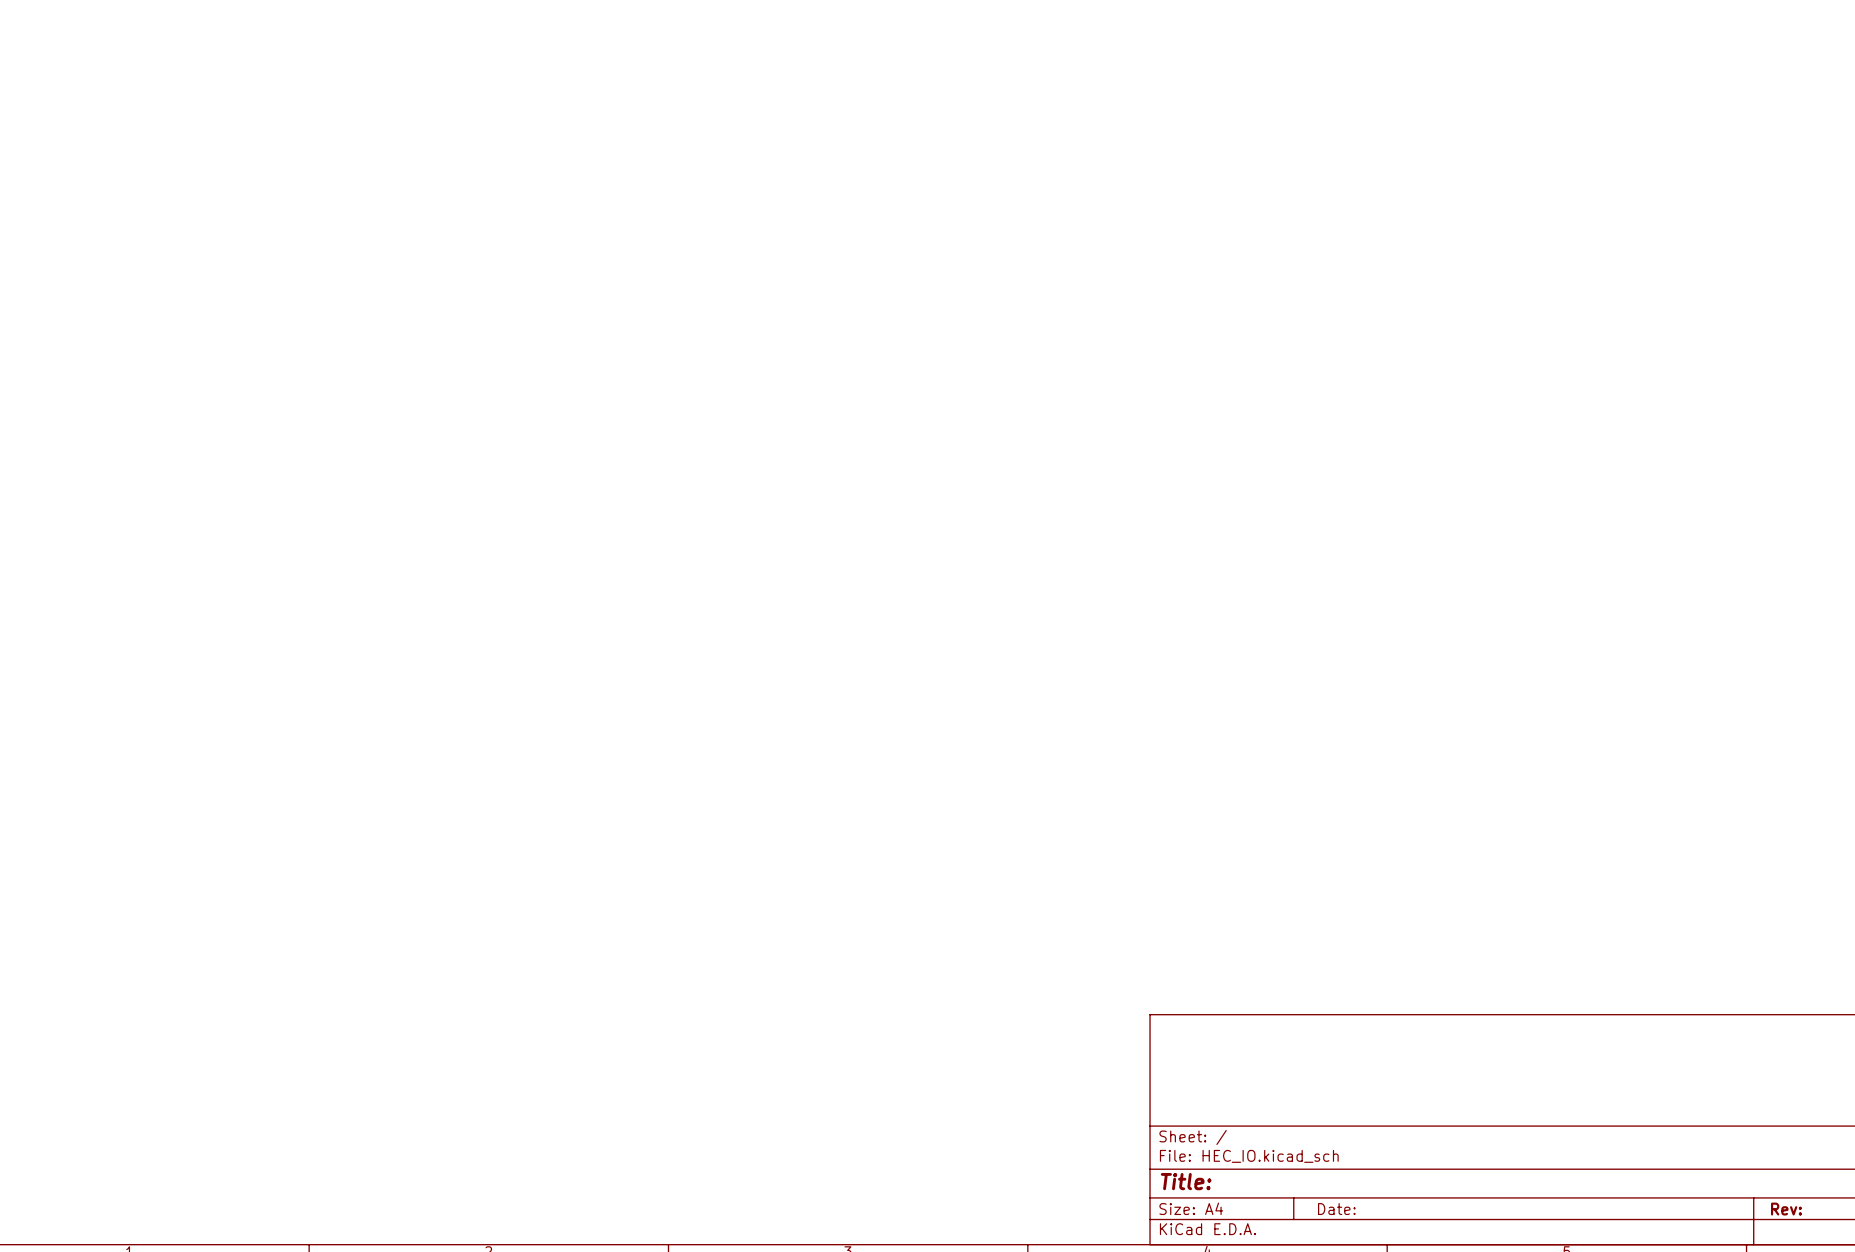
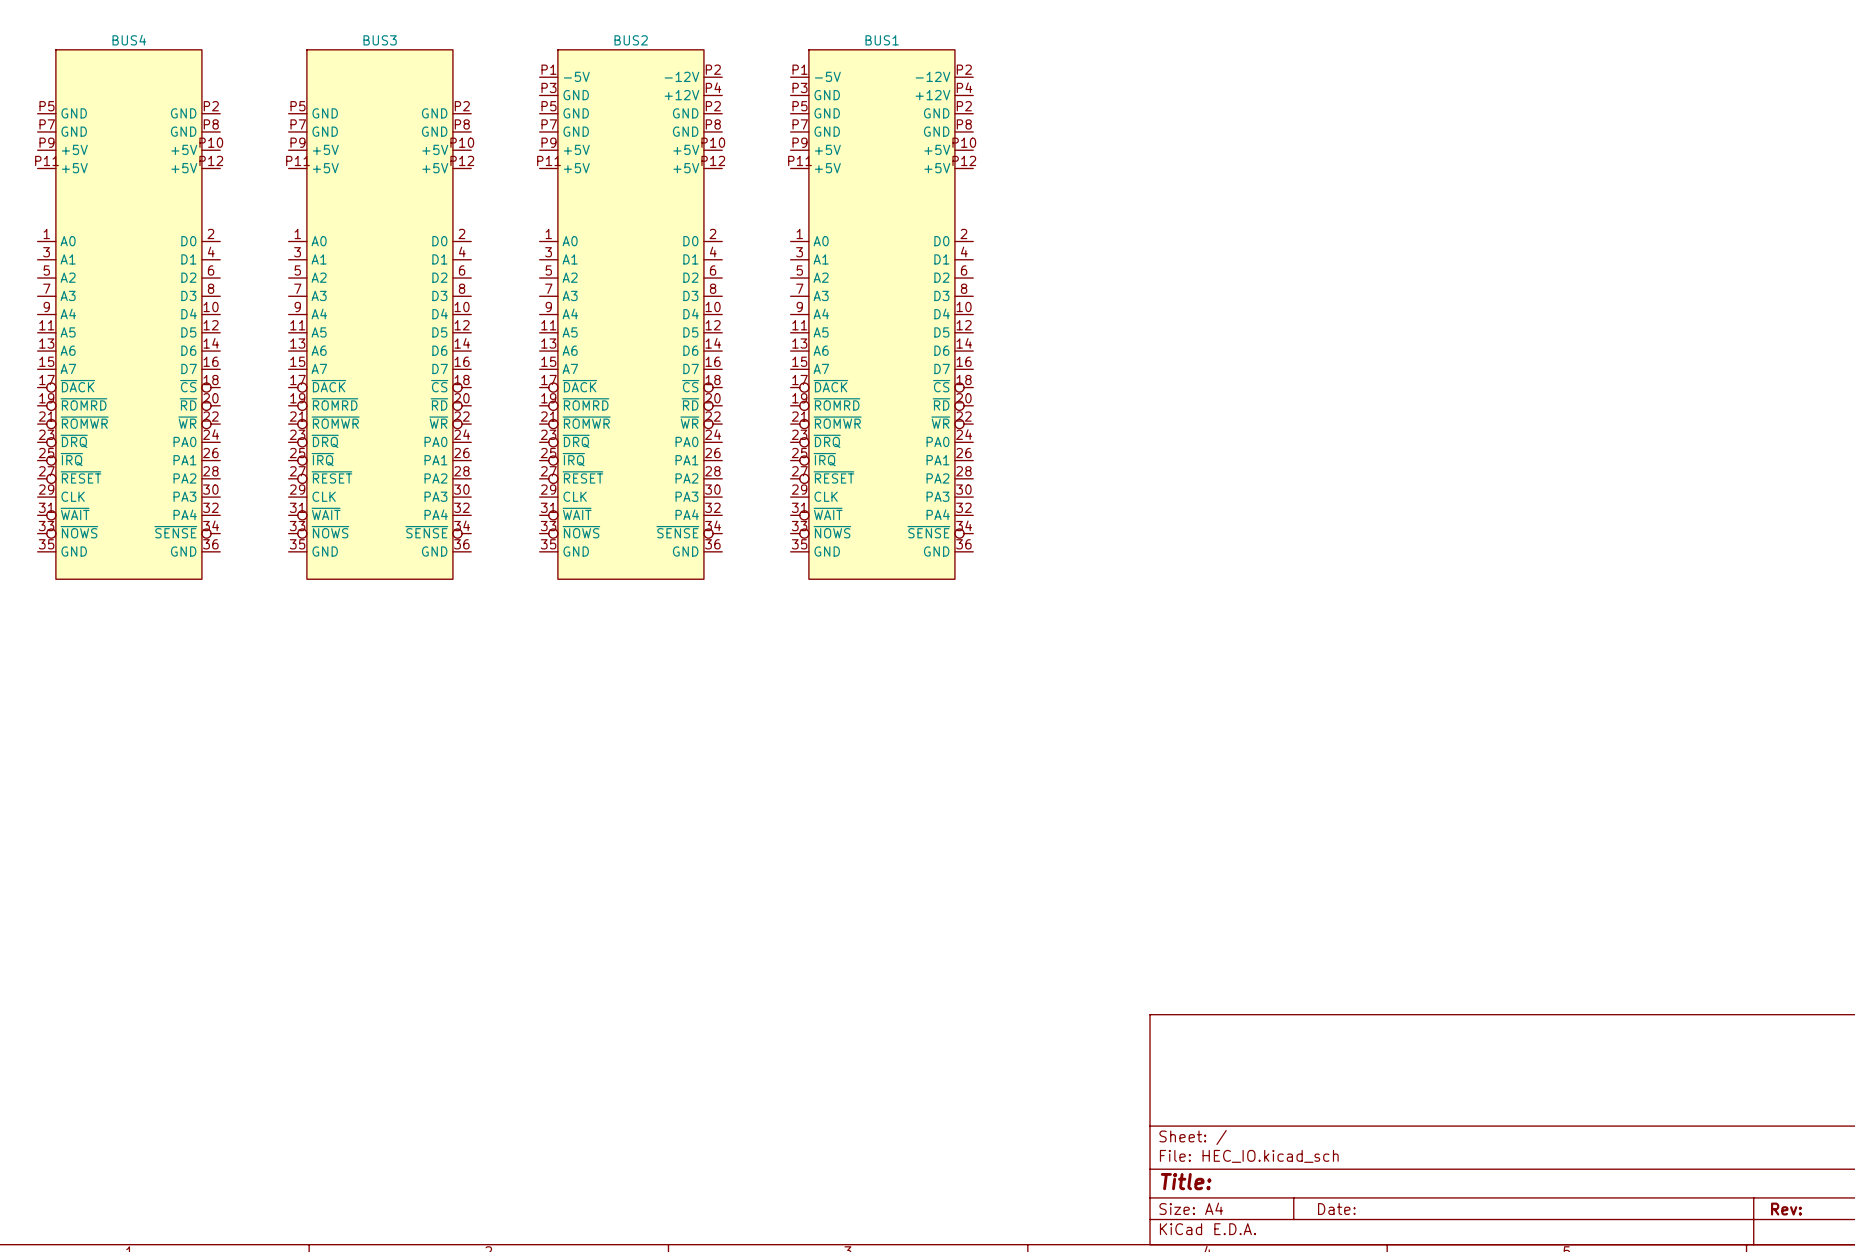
BUS4: none -> (128, 314)
BUS3: none -> (379, 314)
BUS2: none -> (630, 314)
BUS1: none -> (881, 314)

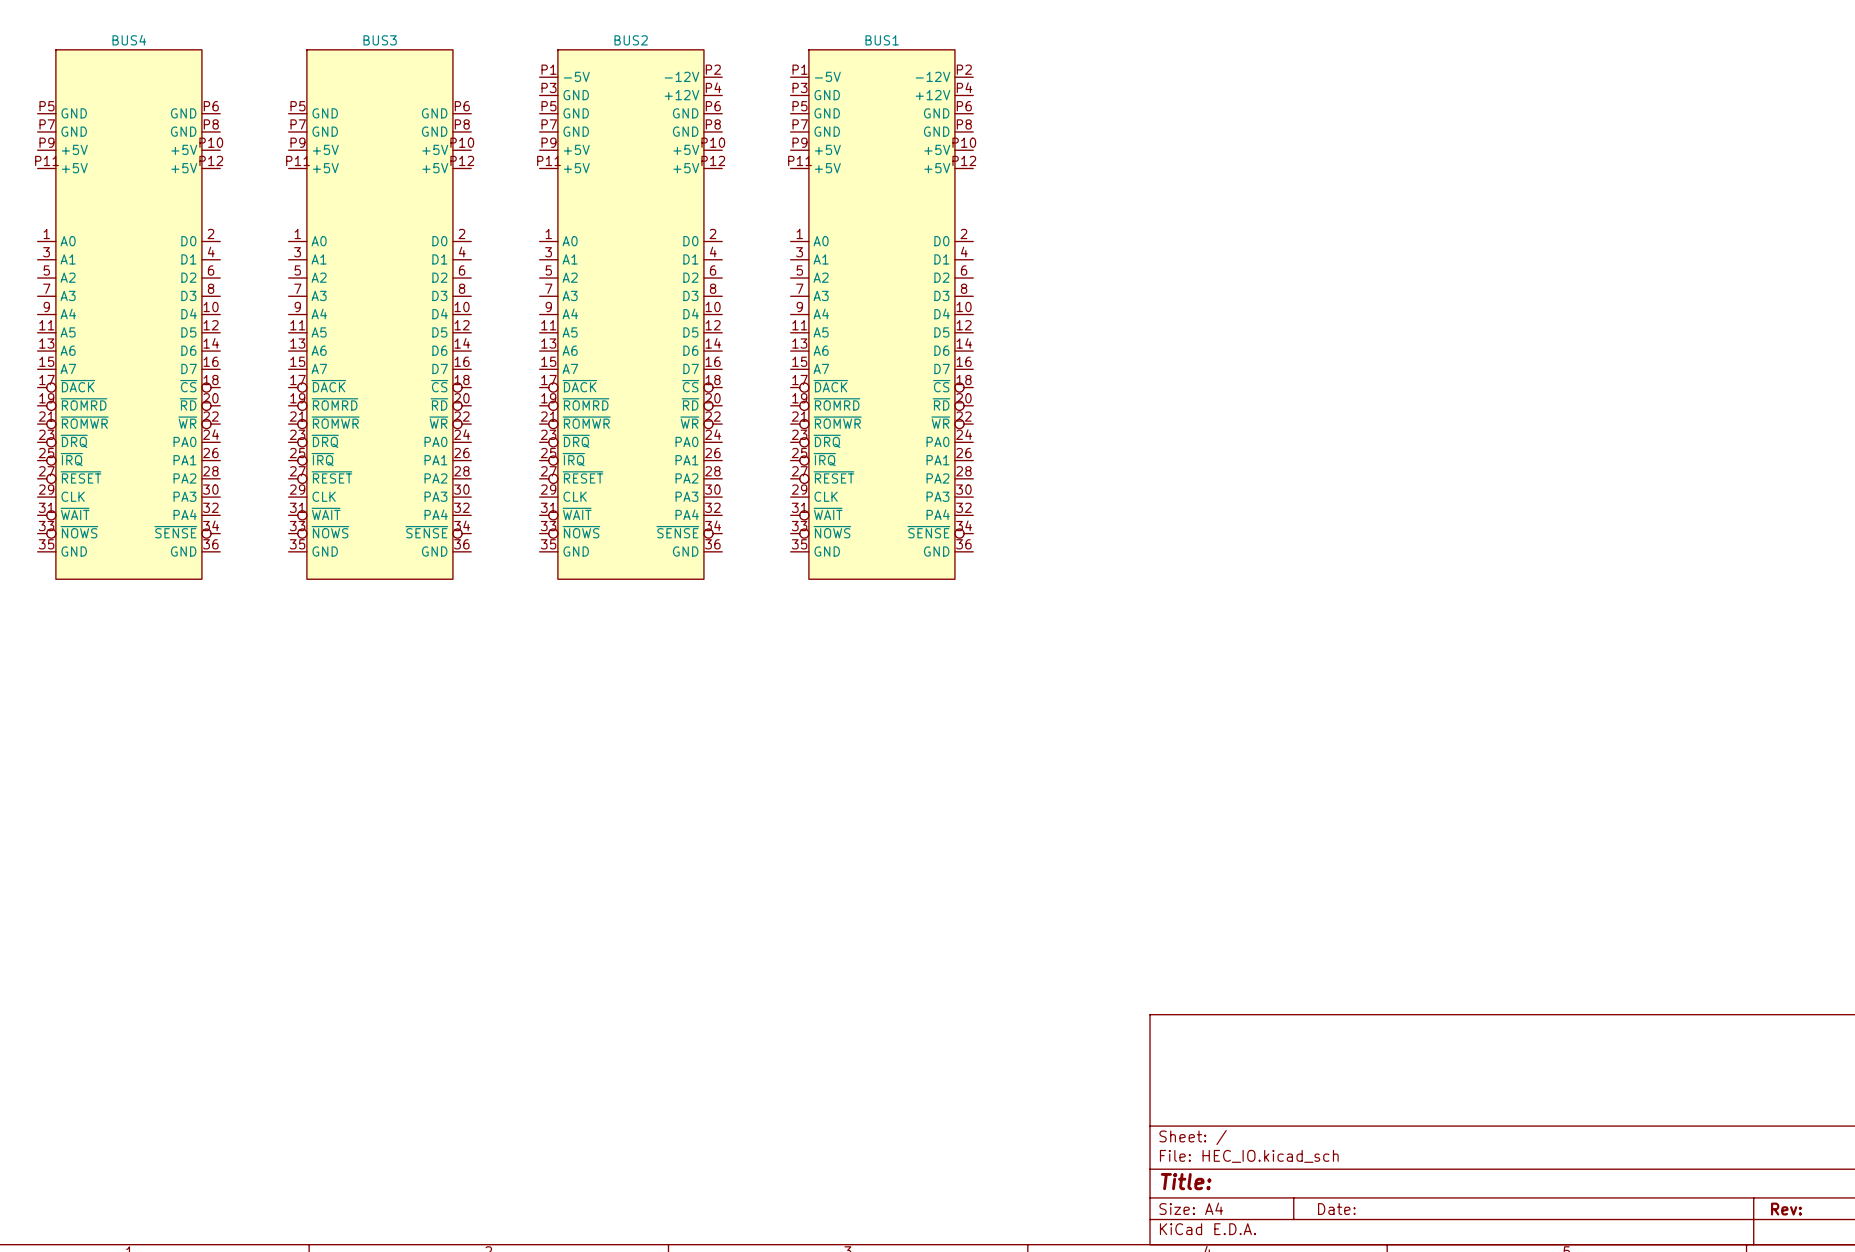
BUS4 pin number: P2 (211, 106) -> P6 (211, 106)
BUS3 pin number: P2 (462, 106) -> P6 (462, 106)
BUS2 pin number: P2 (713, 106) -> P6 (713, 106)
BUS1 pin number: P2 (964, 106) -> P6 (964, 106)

